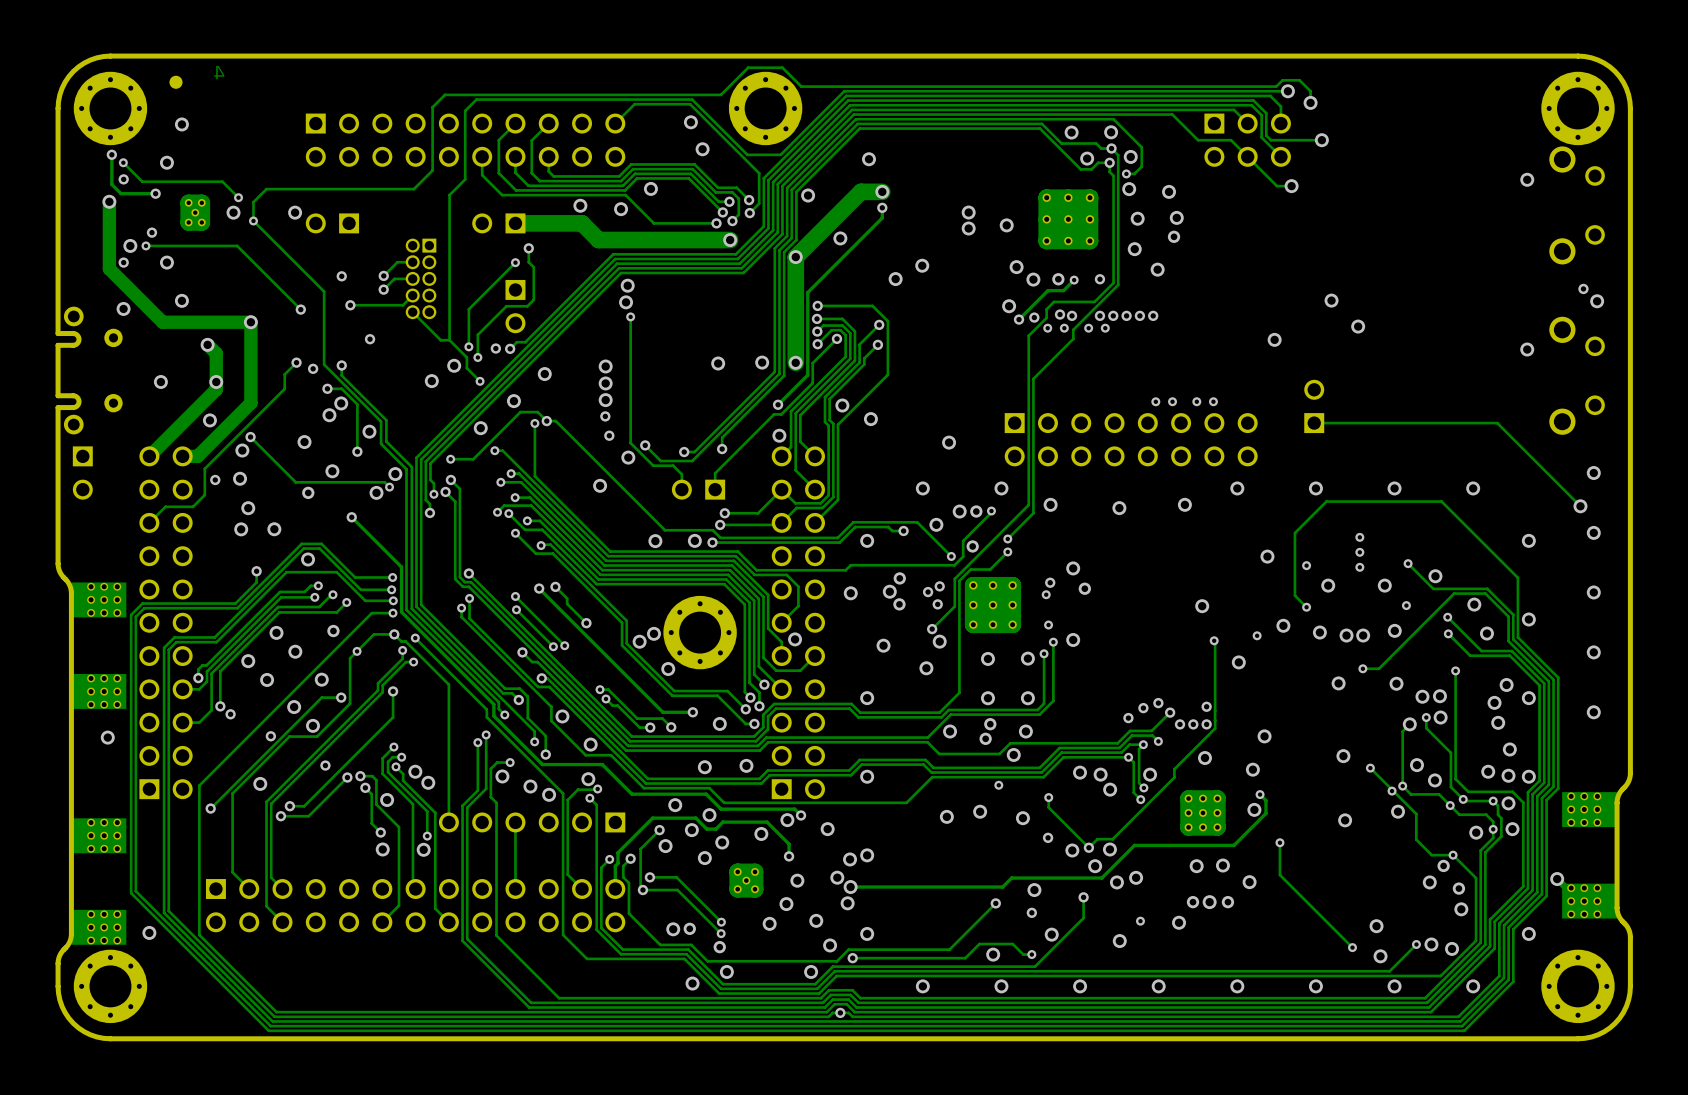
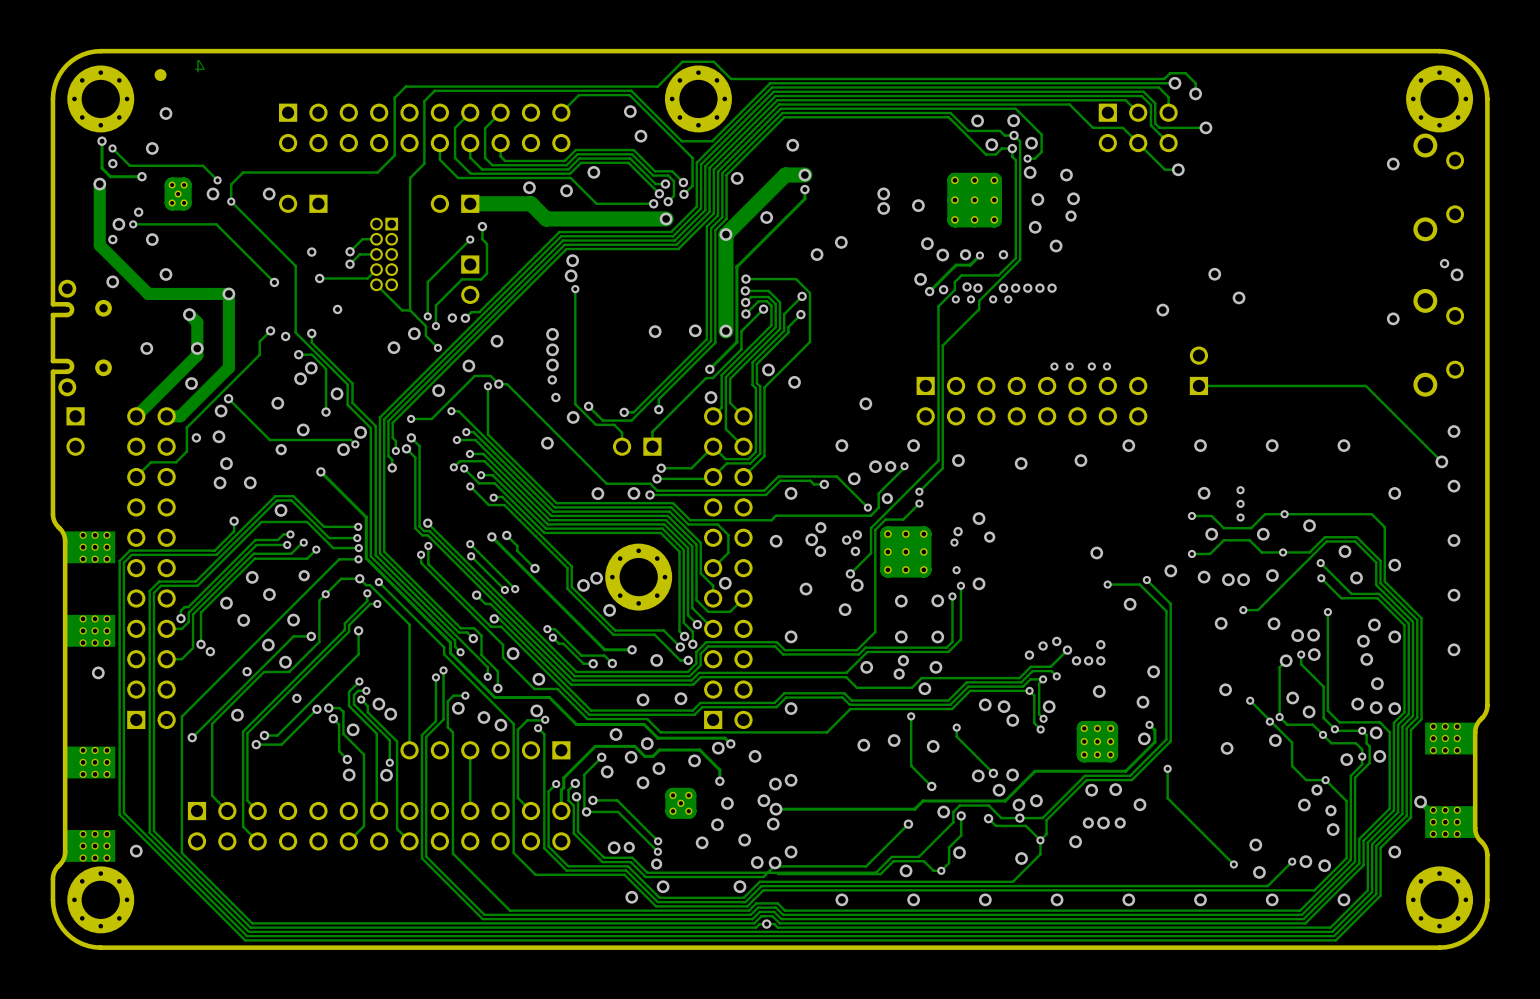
via position: (1267, 556) -> (1204, 493)
track: (1408, 563) (1433, 588) (1452, 588) -> (1191, 553) (1210, 553) (1223, 540) (1249, 540) (1261, 552) (1309, 552) (1324, 537)
track: (1503, 563) (1441, 501) (1326, 501) (1294, 533) (1294, 595) (1306, 607) -> (1371, 514) (1265, 514) (1251, 528) (1223, 528) (1211, 516) (1191, 516)
track: none -> (1146, 580) (1170, 603) (1170, 741) (1131, 780) (1086, 780) (1046, 820) (1046, 834) (1040, 840)
track: (1214, 640) (1215, 710) -> (1107, 584) (1139, 584) (1166, 611) (1166, 739) (1130, 775) (1084, 775) (1042, 818) (1001, 818) (988, 805) (959, 805) (953, 812) (953, 822) (918, 856) (891, 856) (876, 872) (647, 872) (632, 857) (604, 857) (578, 831) (576, 796)
track: (1215, 710) (1215, 720) -> none
track: (1215, 720) (1215, 728) (1174, 769) (1174, 777) (1112, 839) (1097, 839) (1088, 847) -> none
track: none -> (911, 716) (911, 765) (931, 786)
via: (1048, 837) -> none
via: none -> (931, 786)
via: none -> (576, 796)
track: none -> (961, 815) (961, 835) (949, 847) (949, 862) (941, 870)
via: none -> (961, 815)
via: none -> (1019, 818)
track: (1083, 897) (1083, 918) (1035, 966) -> (1040, 840) (1040, 854) (1012, 881) (944, 881)
track: none -> (988, 818) (995, 825) (1025, 825) (1040, 840)
via: (1031, 912) -> none
via: none -> (775, 862)
via: (852, 958) -> none

